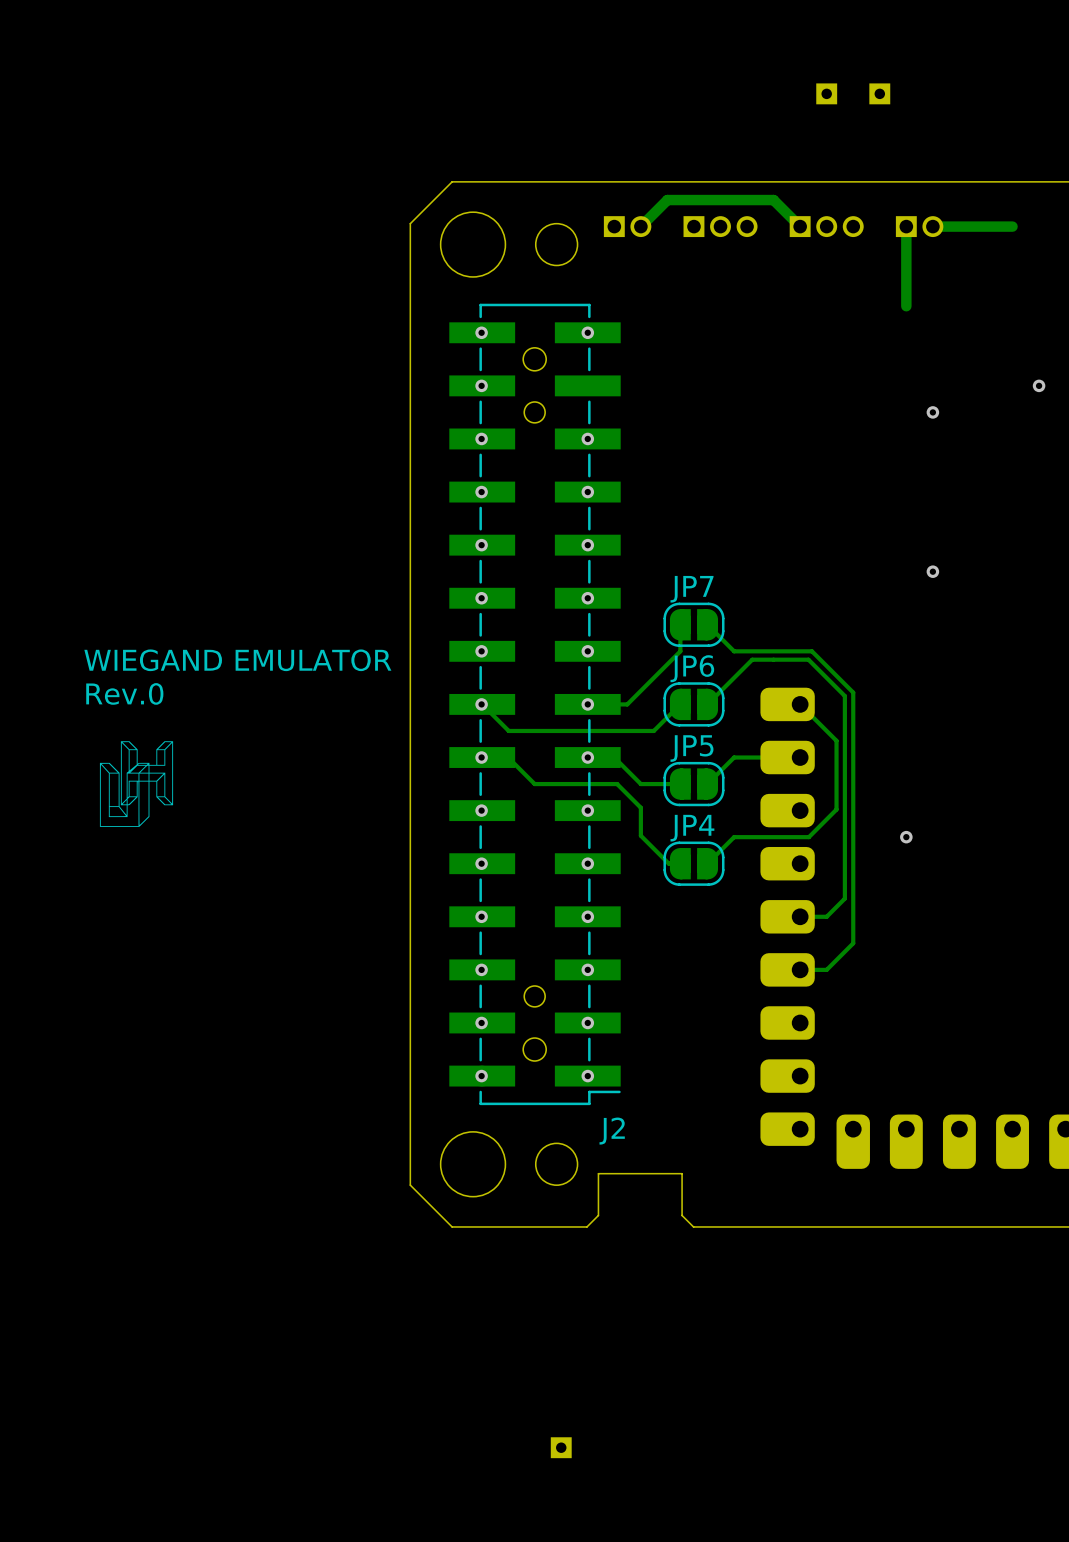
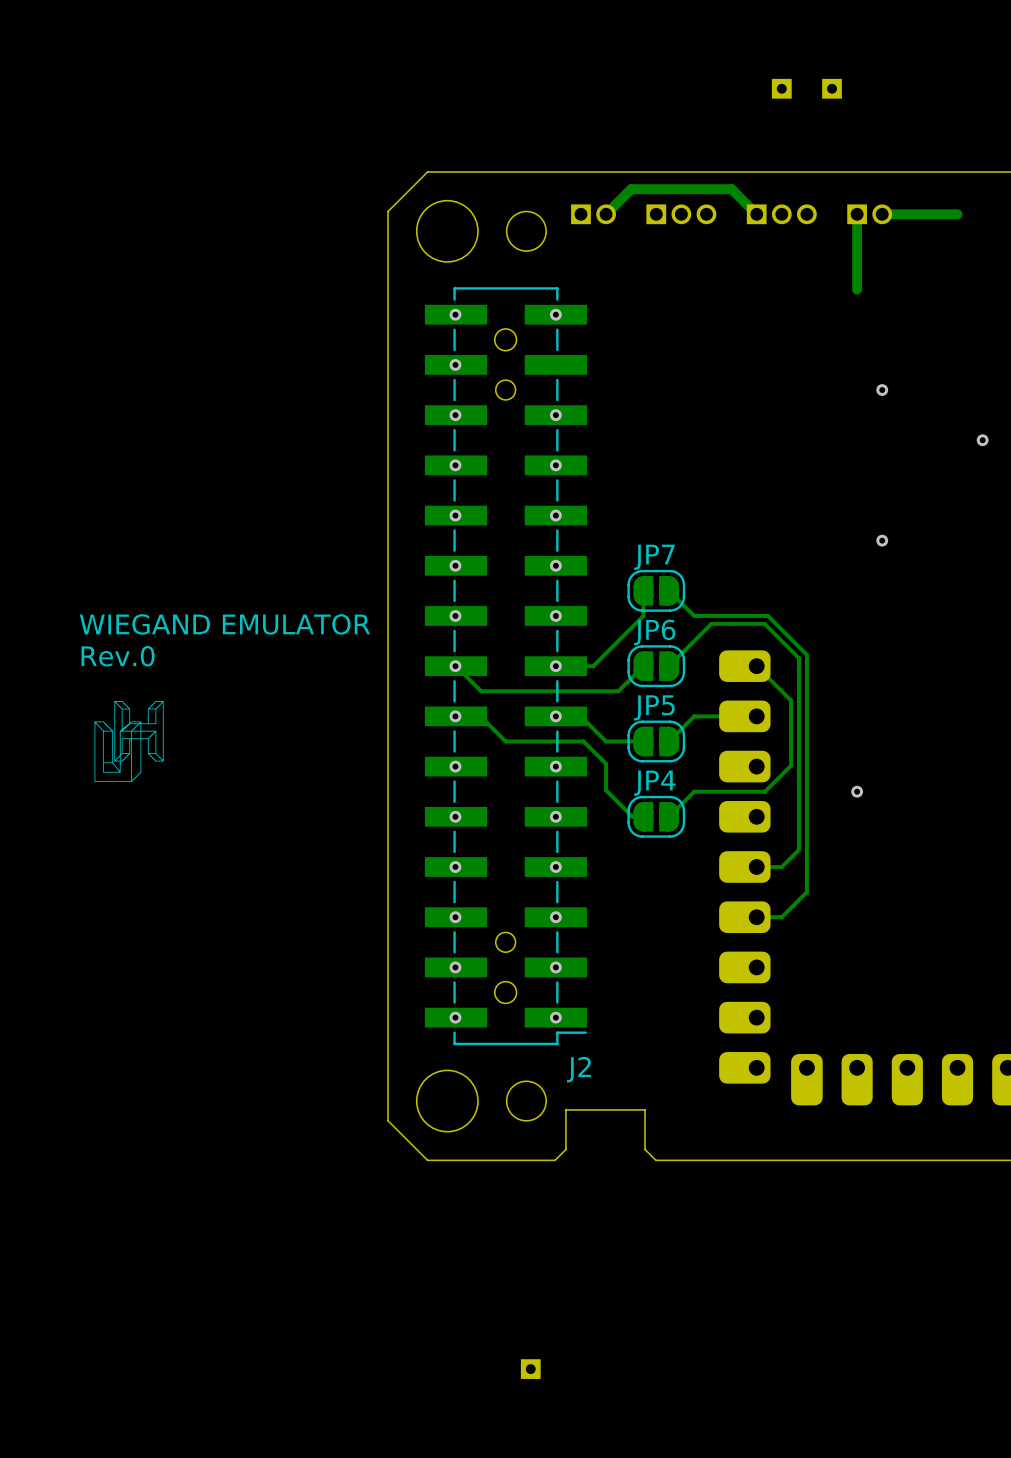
via position: (1039, 385) -> (982, 440)

